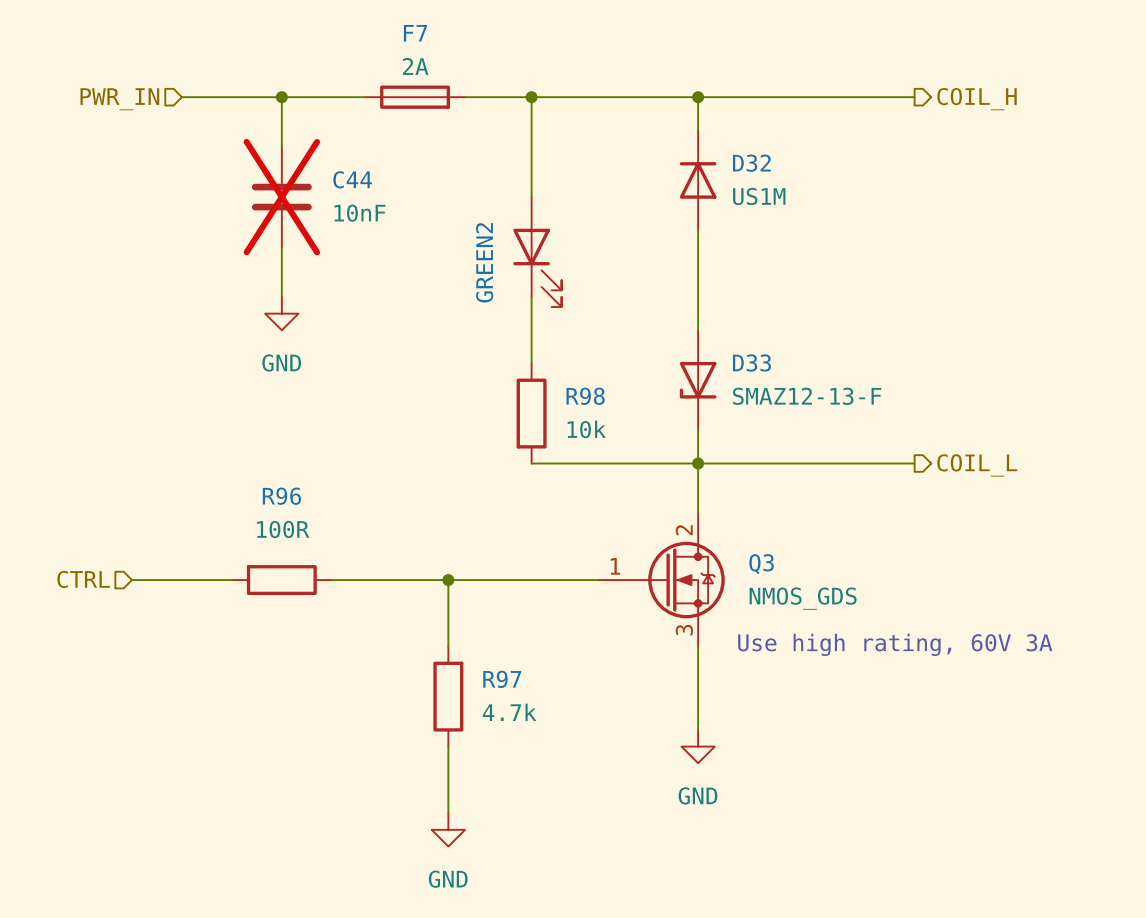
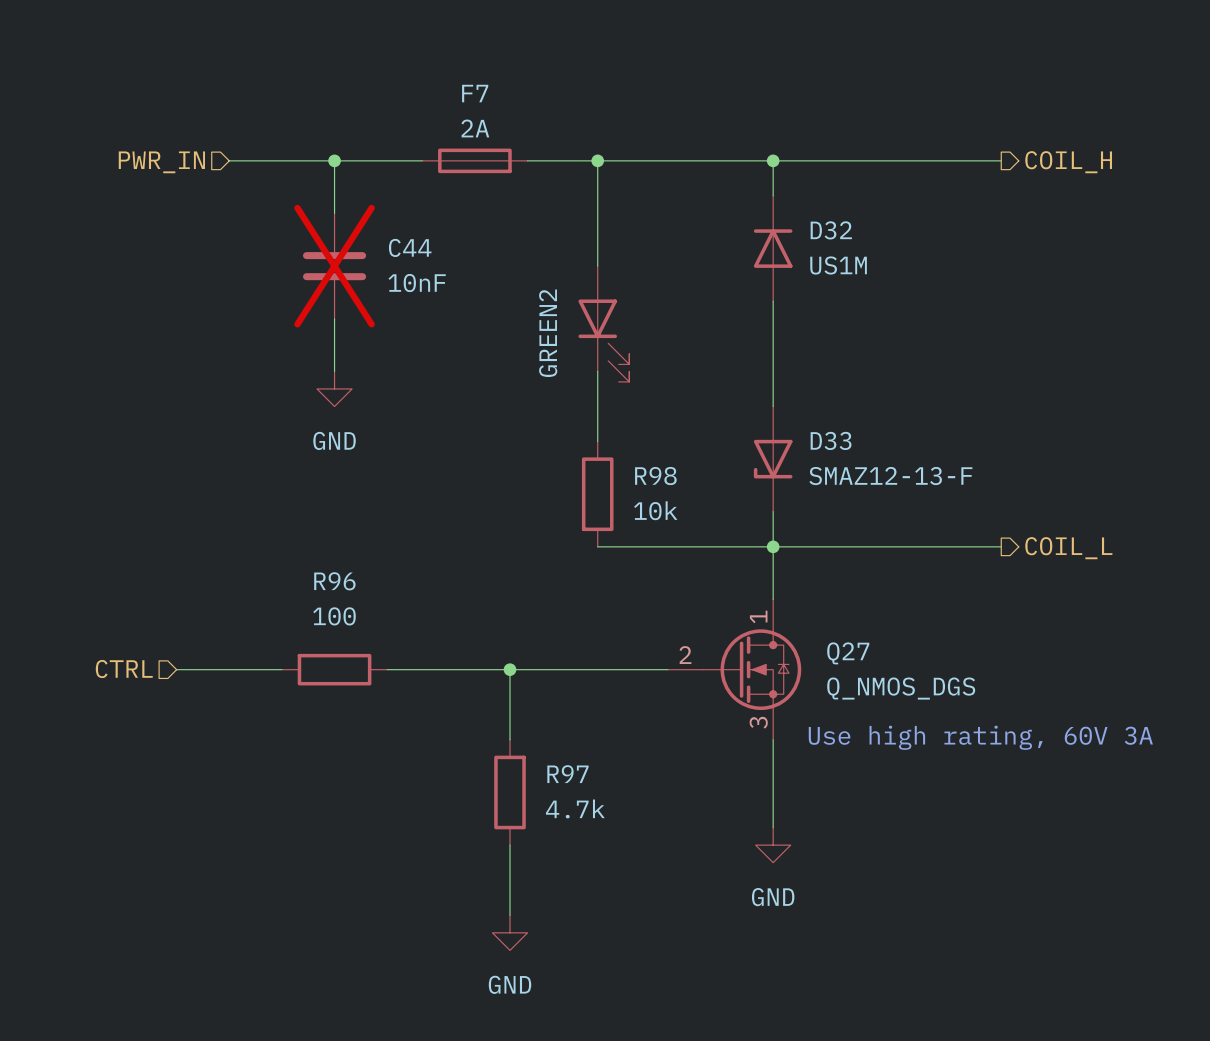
R96 value: 100R (283, 529) -> 100 (334, 616)
Q3: NMOS_GDS (661, 580) -> none
Q27: none -> Q_NMOS_DGS (734, 669)

